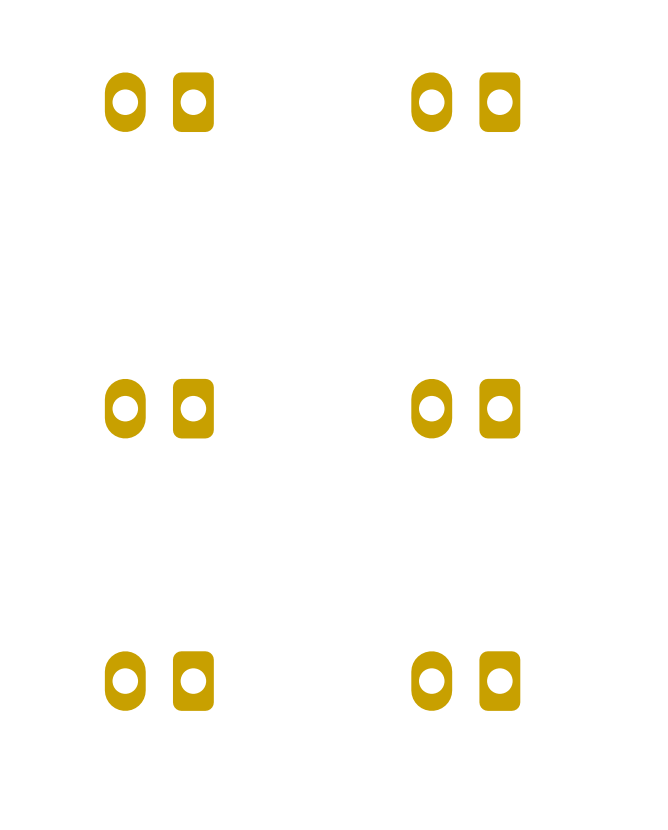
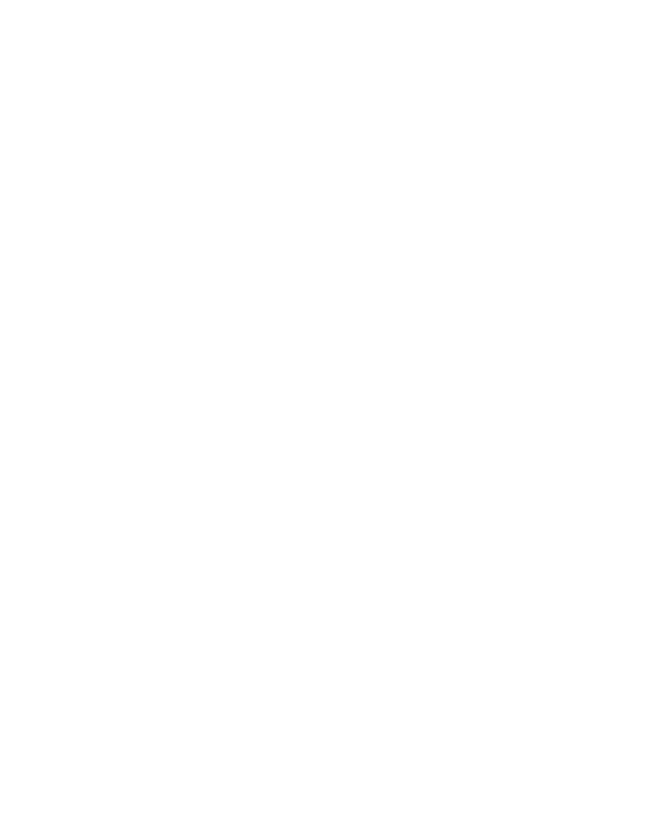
part: (159, 102) -> none
part: (465, 102) -> none
part: (159, 408) -> none
part: (465, 408) -> none
part: (159, 681) -> none
part: (465, 681) -> none

